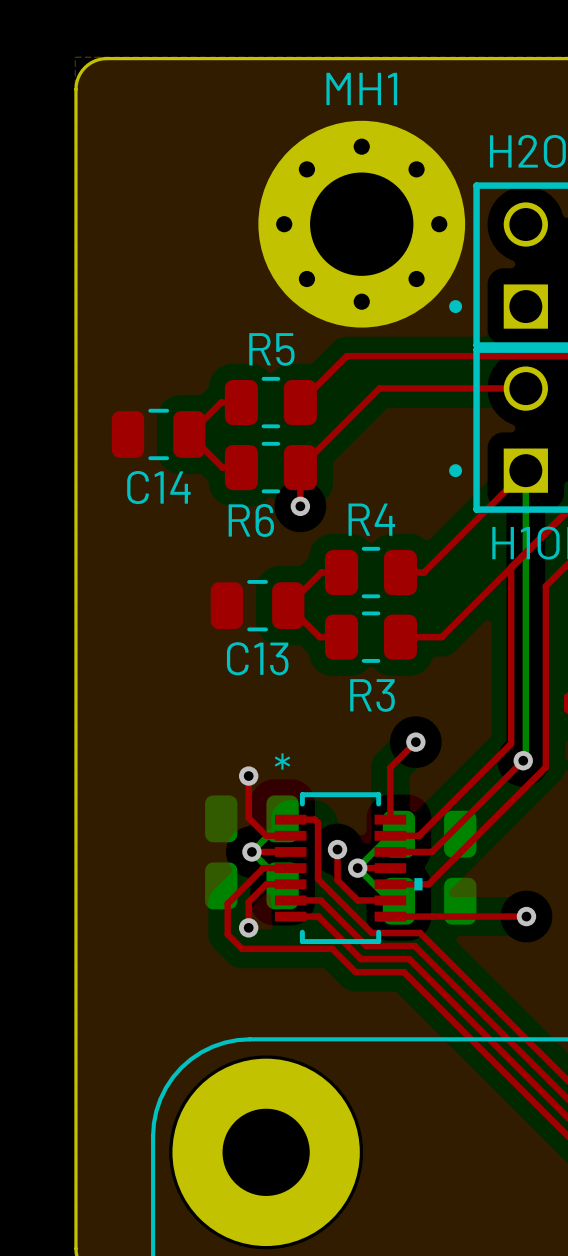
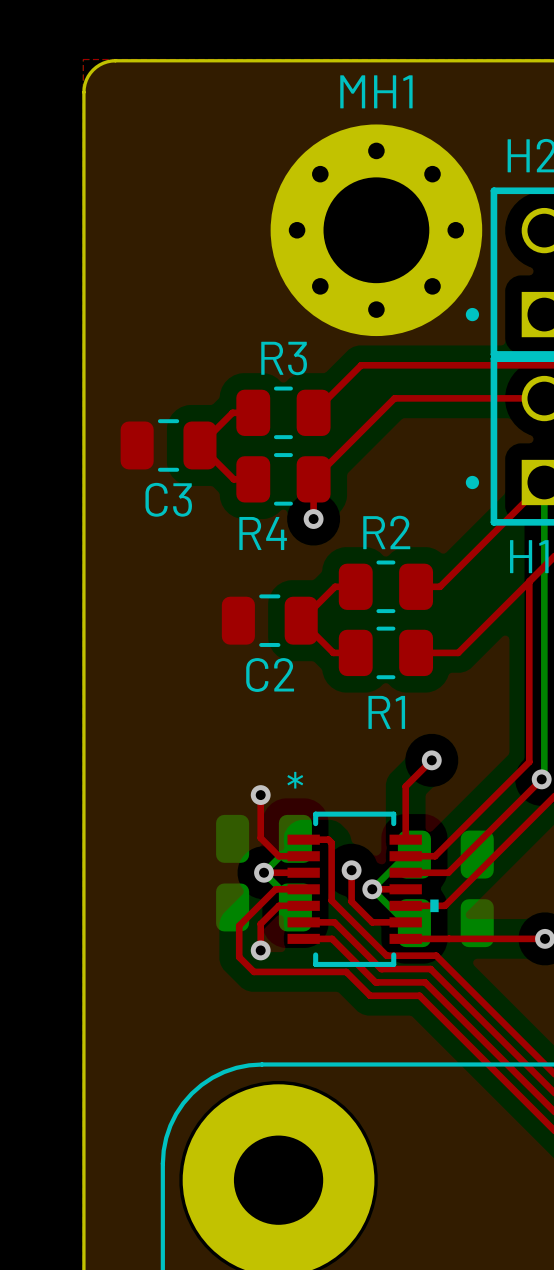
R5 name: R5 (271, 349) -> R3 (284, 358)
C14 name: C14 (158, 487) -> C3 (168, 499)
R4 name: R4 (371, 519) -> R2 (386, 532)
R6 name: R6 (251, 520) -> R4 (263, 533)
C13 name: C13 (257, 658) -> C2 (270, 675)
R3 name: R3 (372, 695) -> R1 (386, 712)

